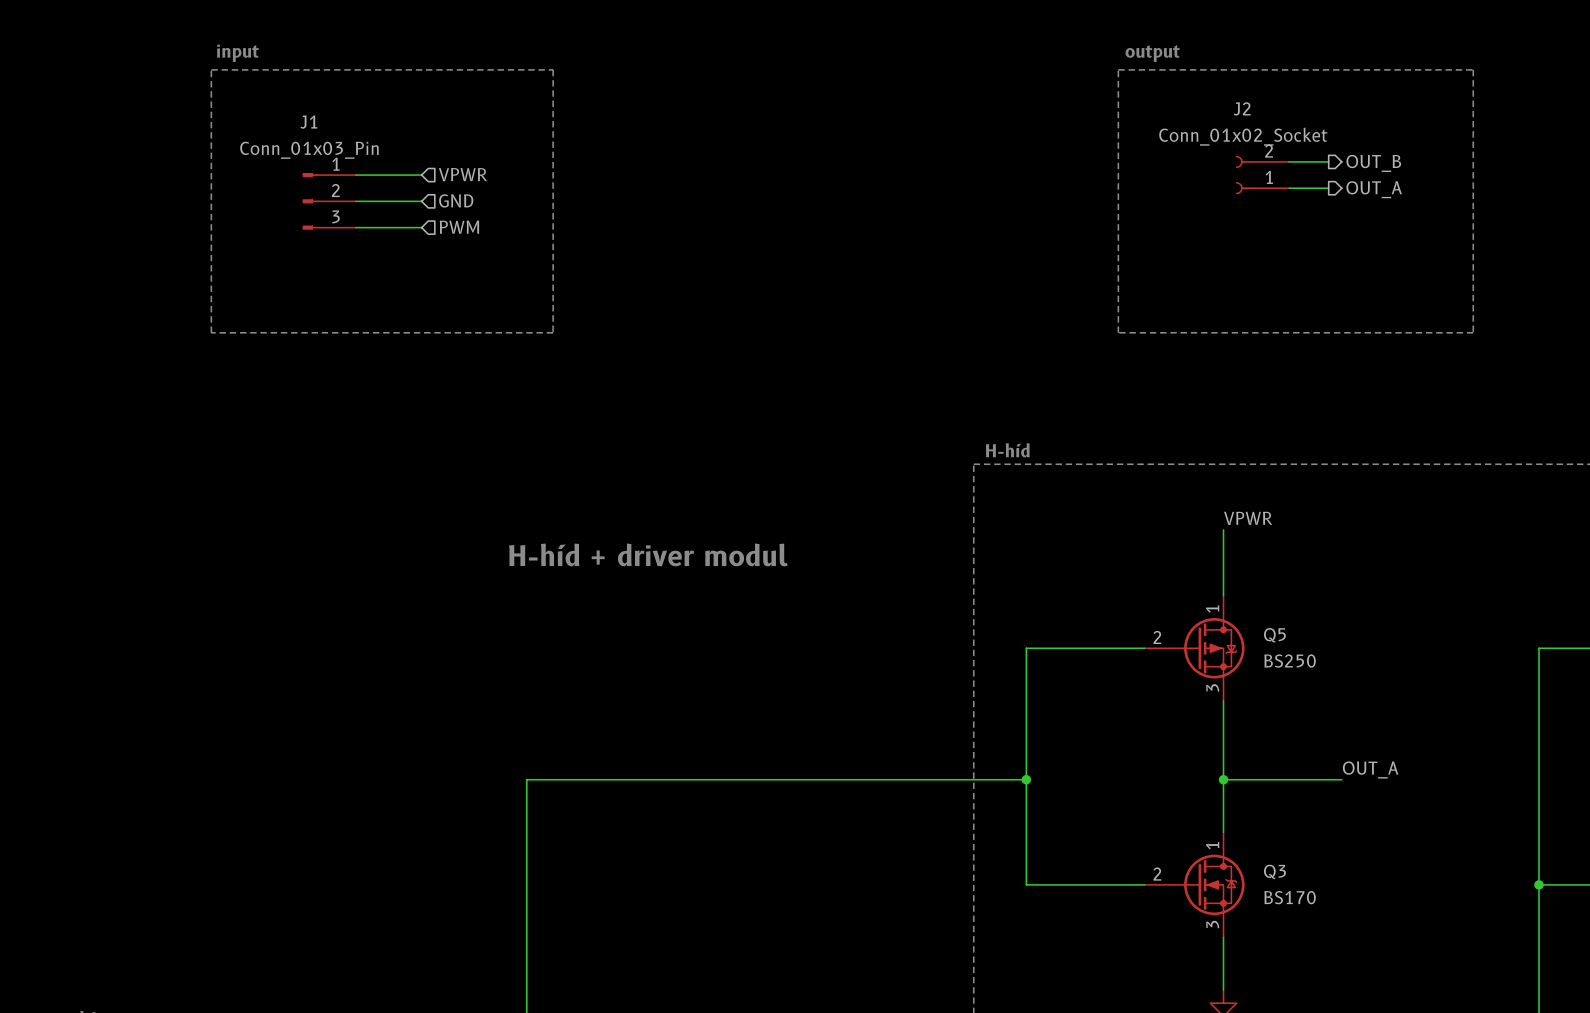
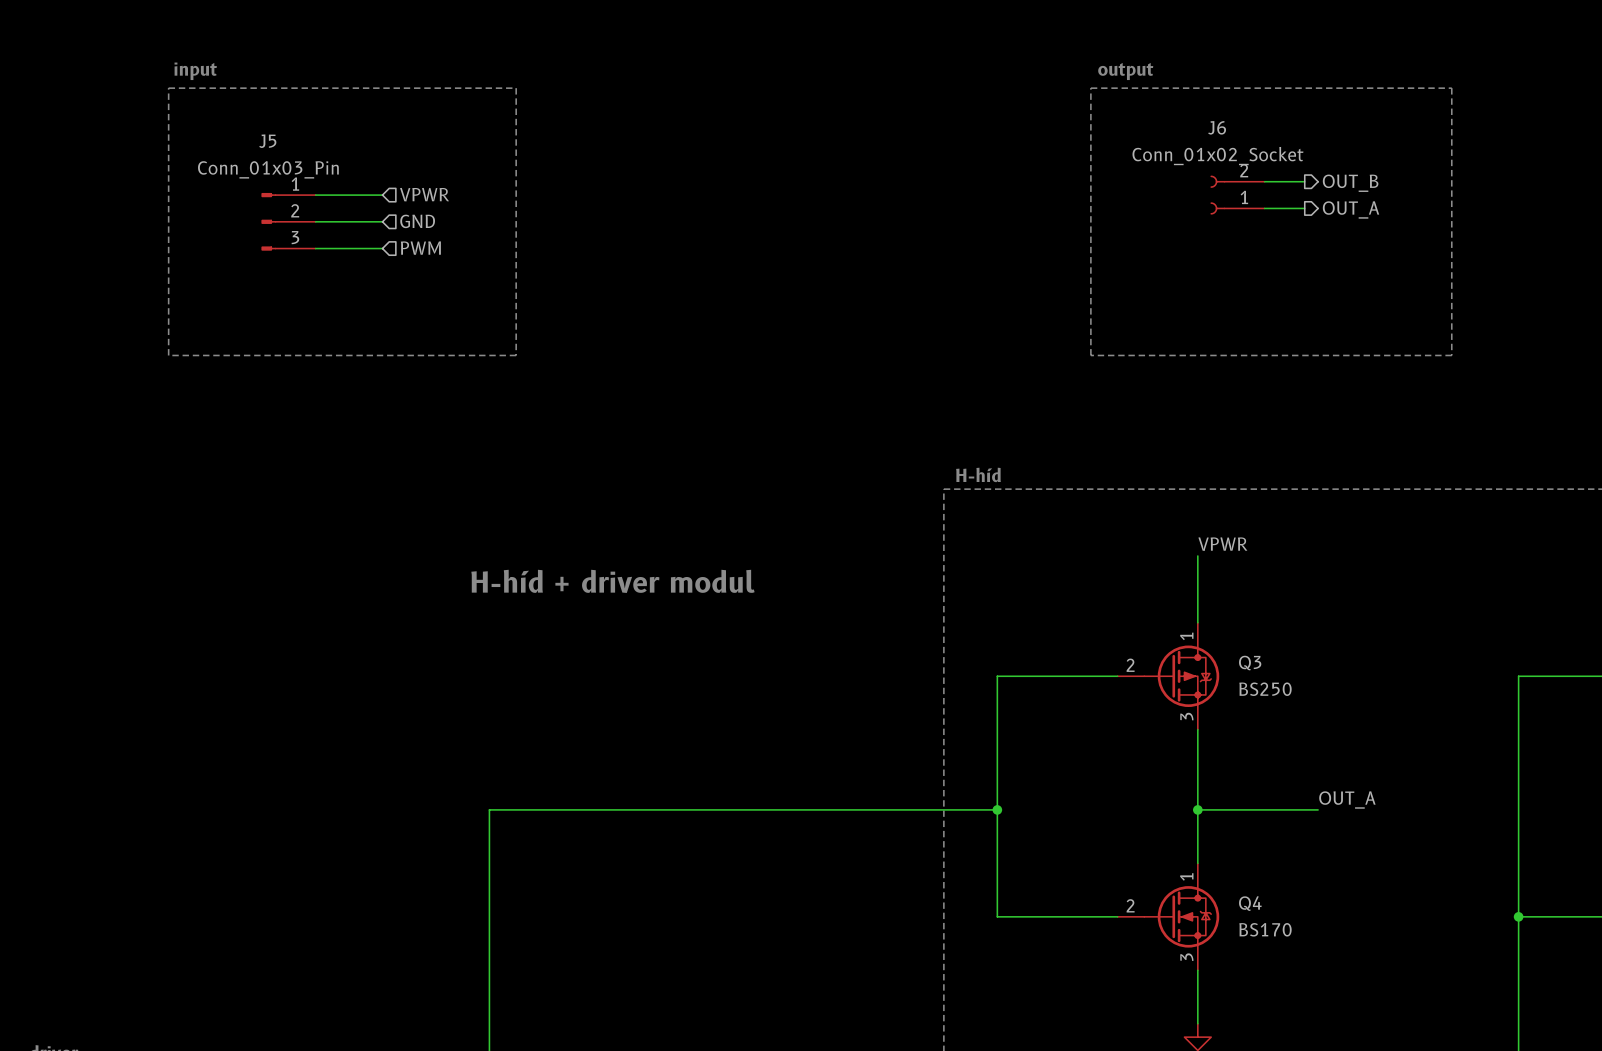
J2 name: J2 (1242, 108) -> J6 (1217, 127)
J1 name: J1 (308, 122) -> J5 (267, 141)
Q5 name: Q5 (1274, 635) -> Q3 (1250, 663)
Q3 name: Q3 (1274, 871) -> Q4 (1250, 903)

